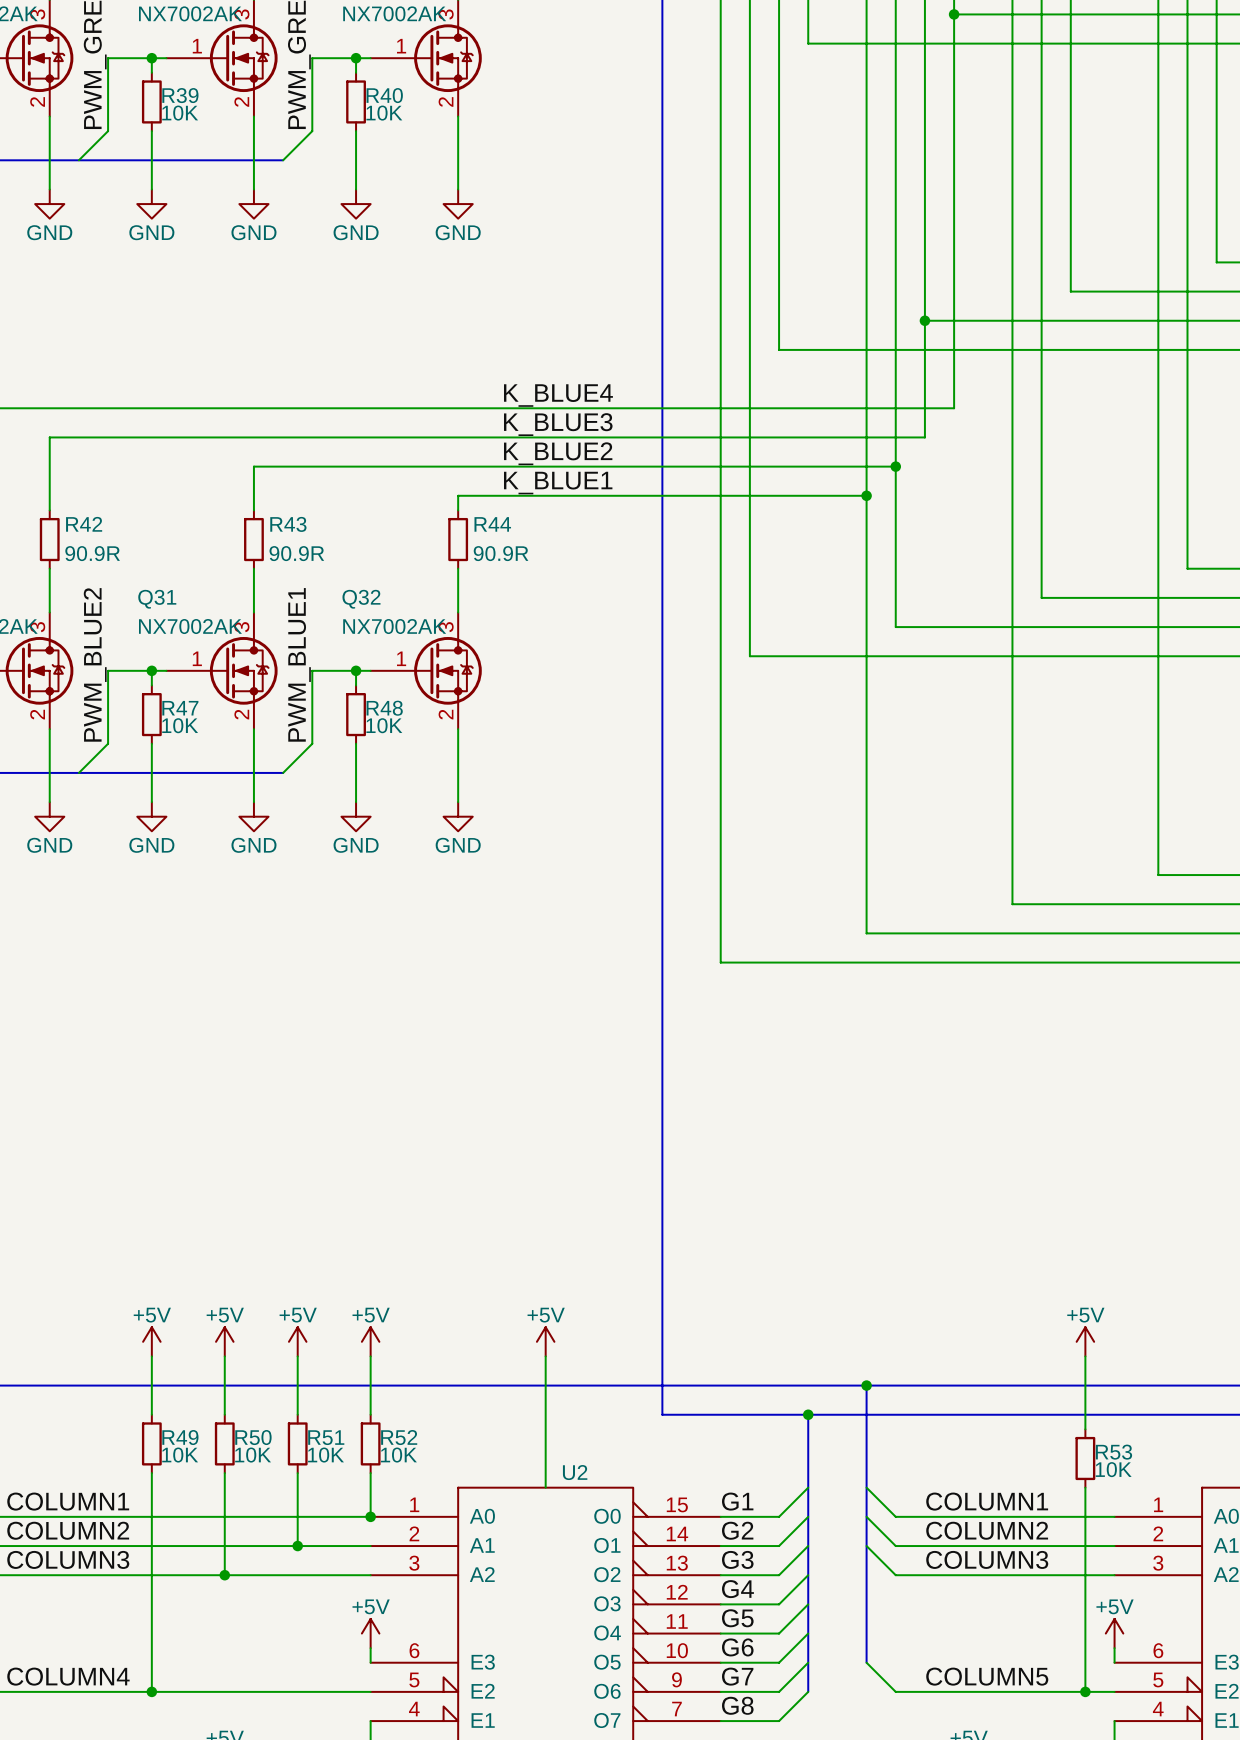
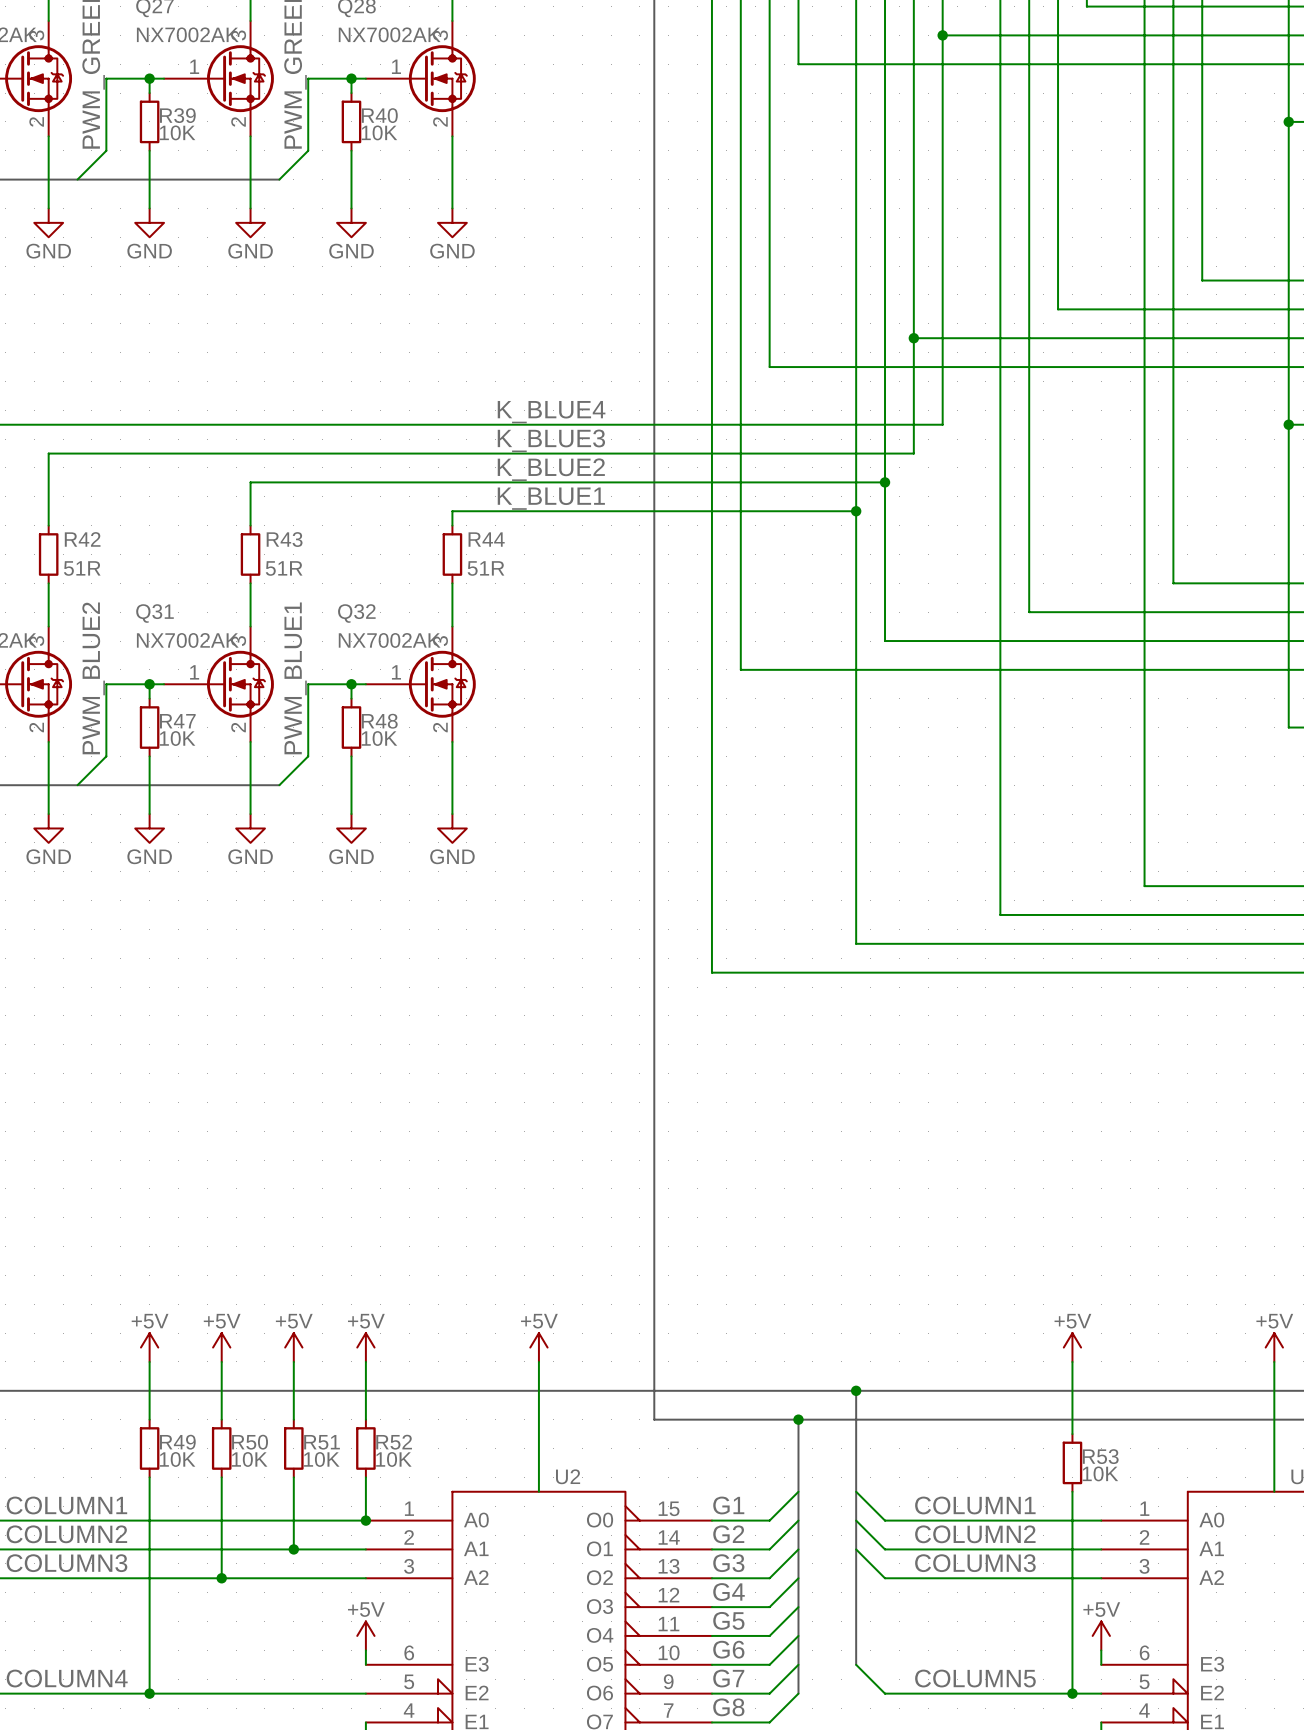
R42 value: 90.9R (92, 553) -> 51R (82, 568)
R43 value: 90.9R (296, 553) -> 51R (284, 568)
R44 value: 90.9R (501, 553) -> 51R (486, 568)

